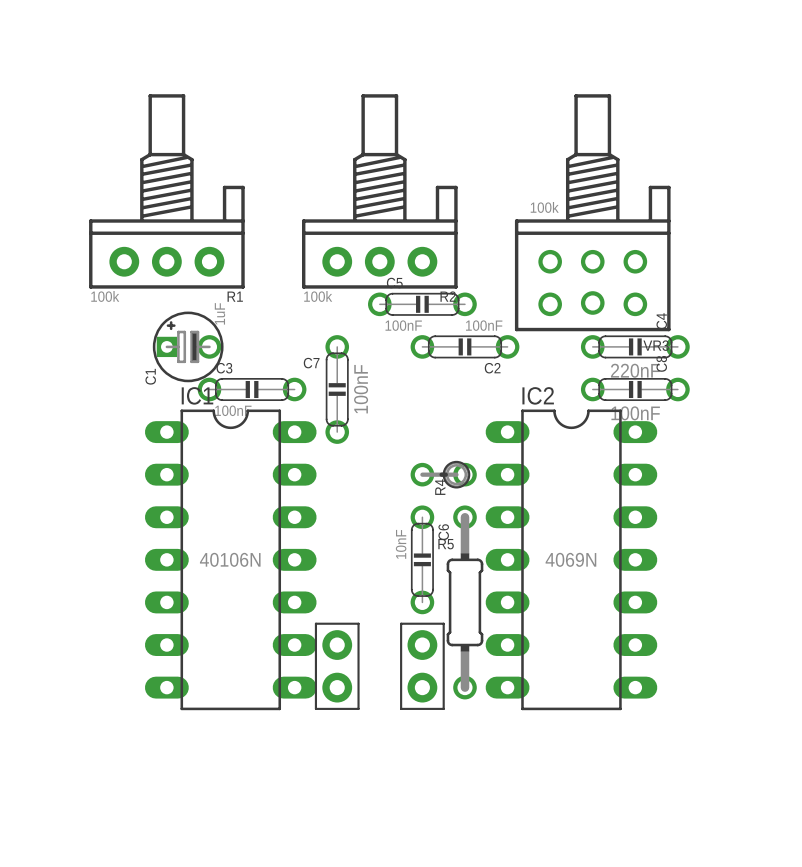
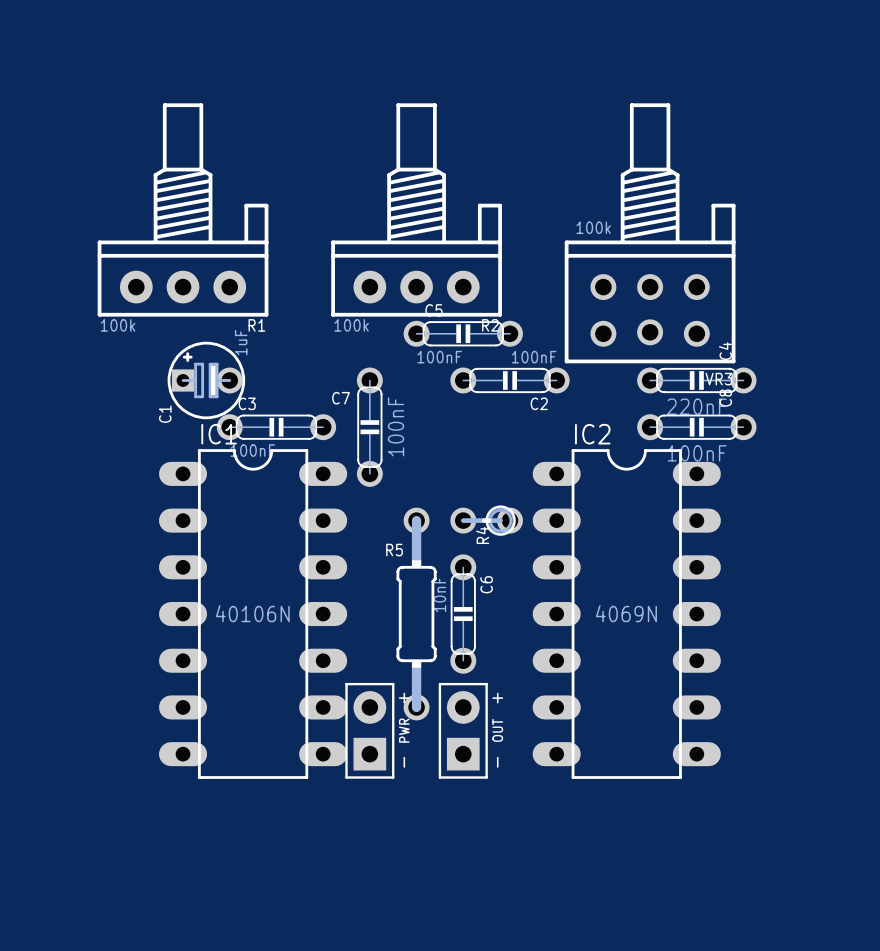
R5 position: (464, 602) -> (416, 614)
part: (337, 666) -> none
PWR: none -> (377, 730)
part: (422, 666) -> none
OUT: none -> (470, 730)

